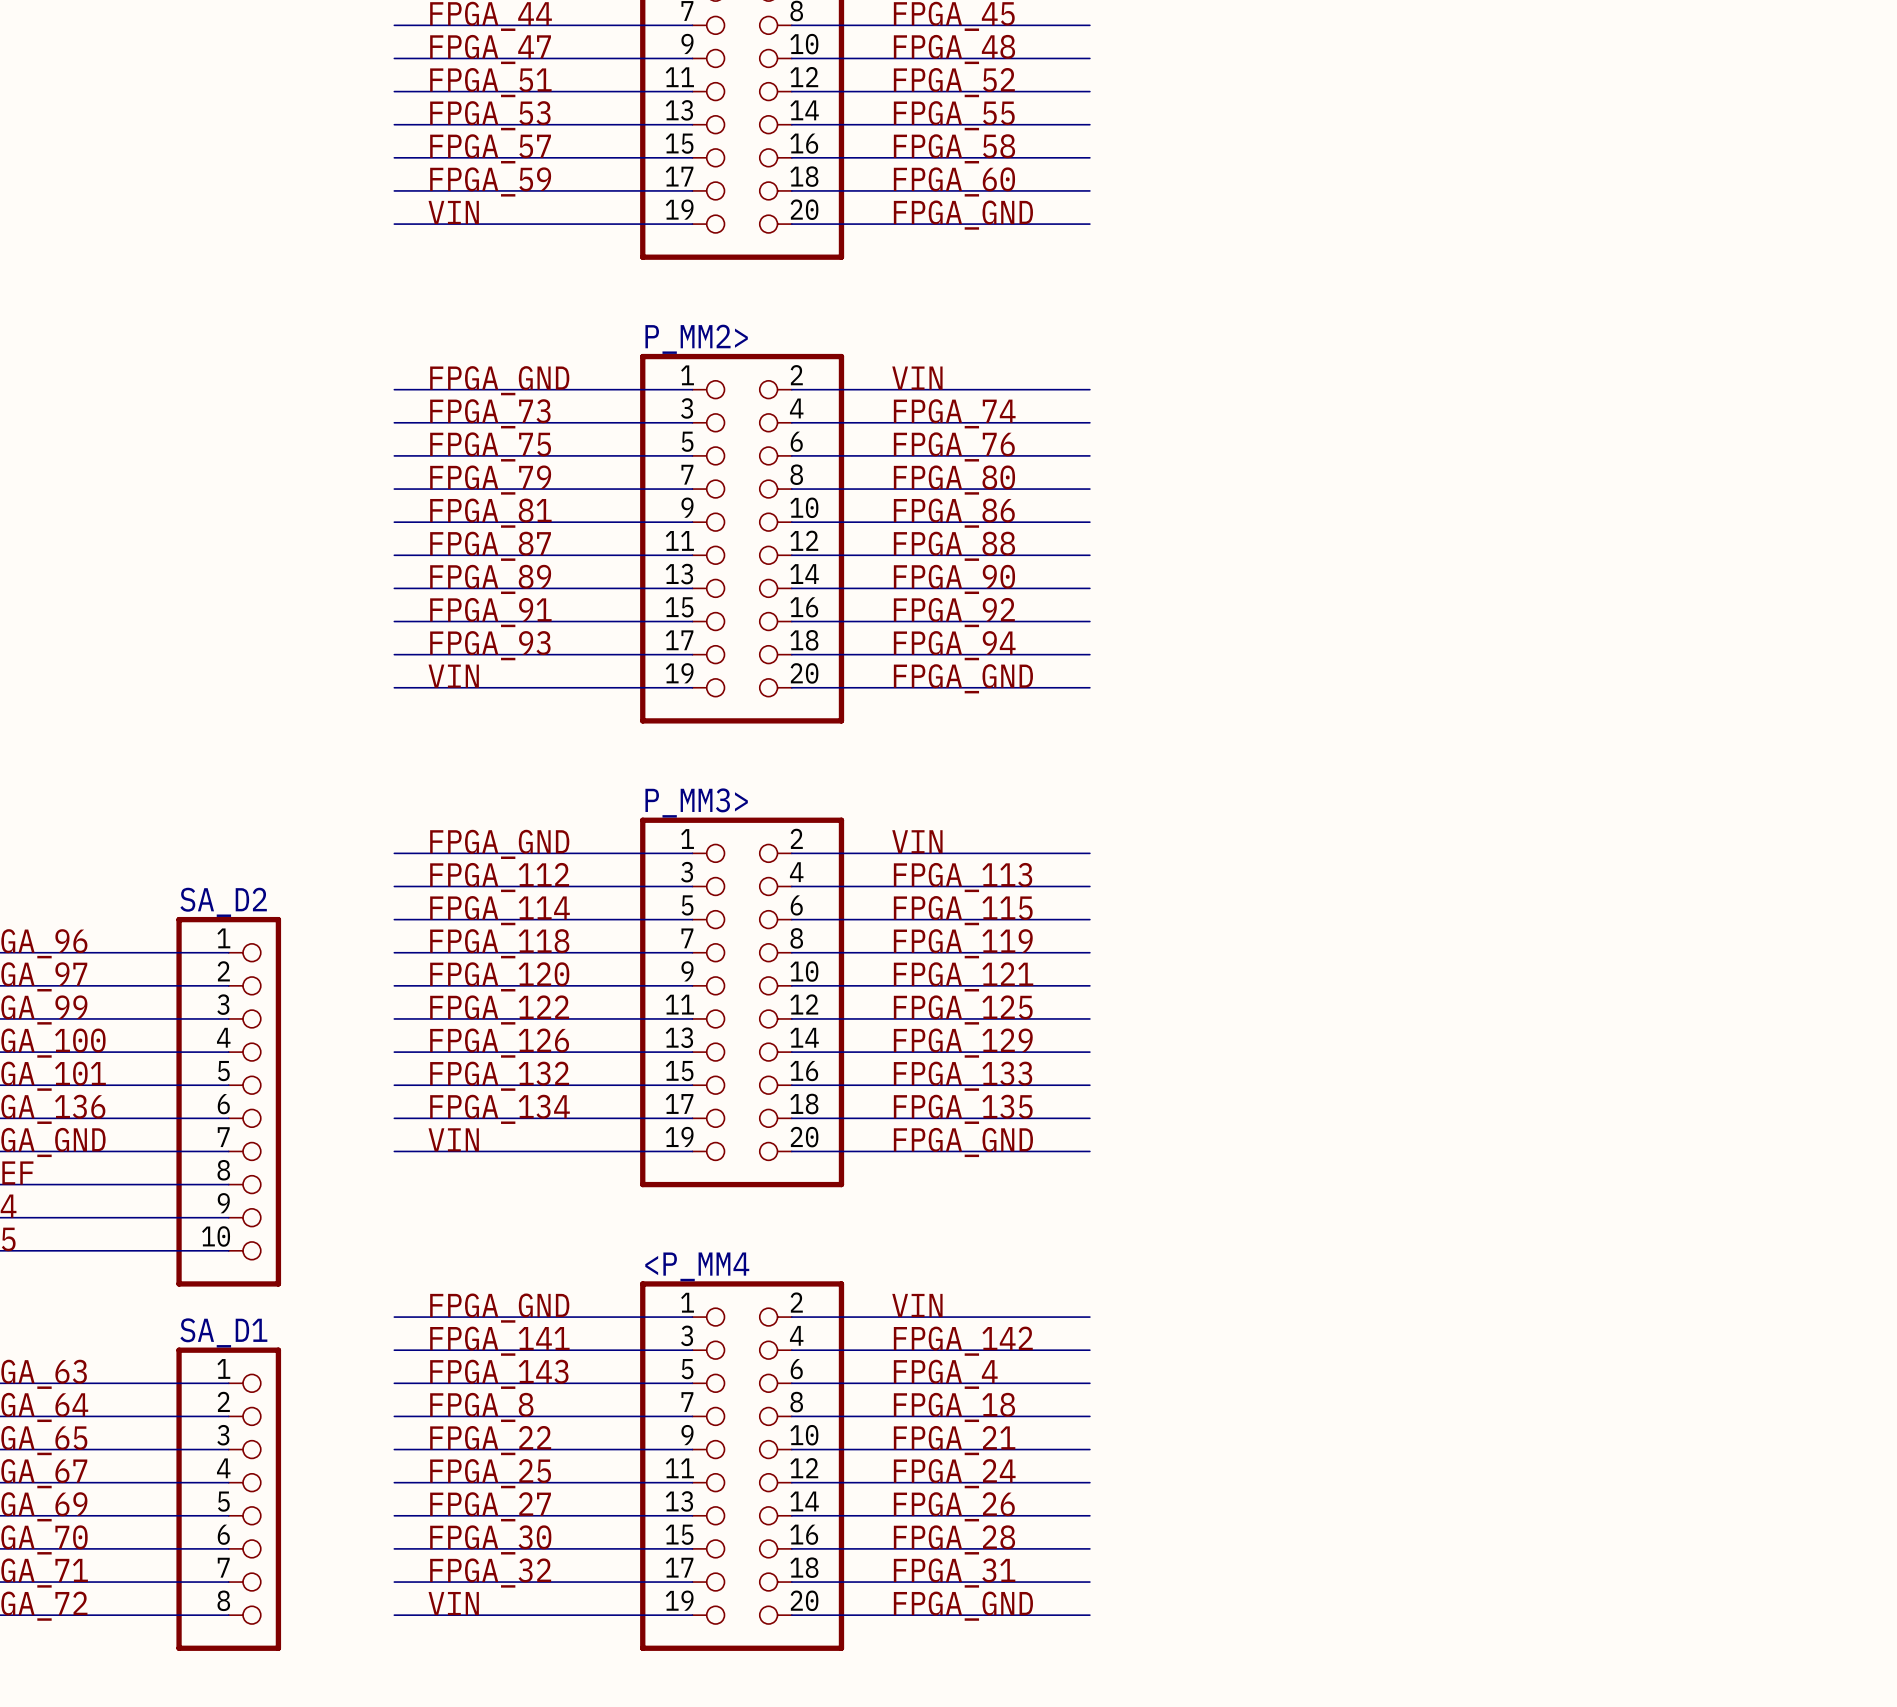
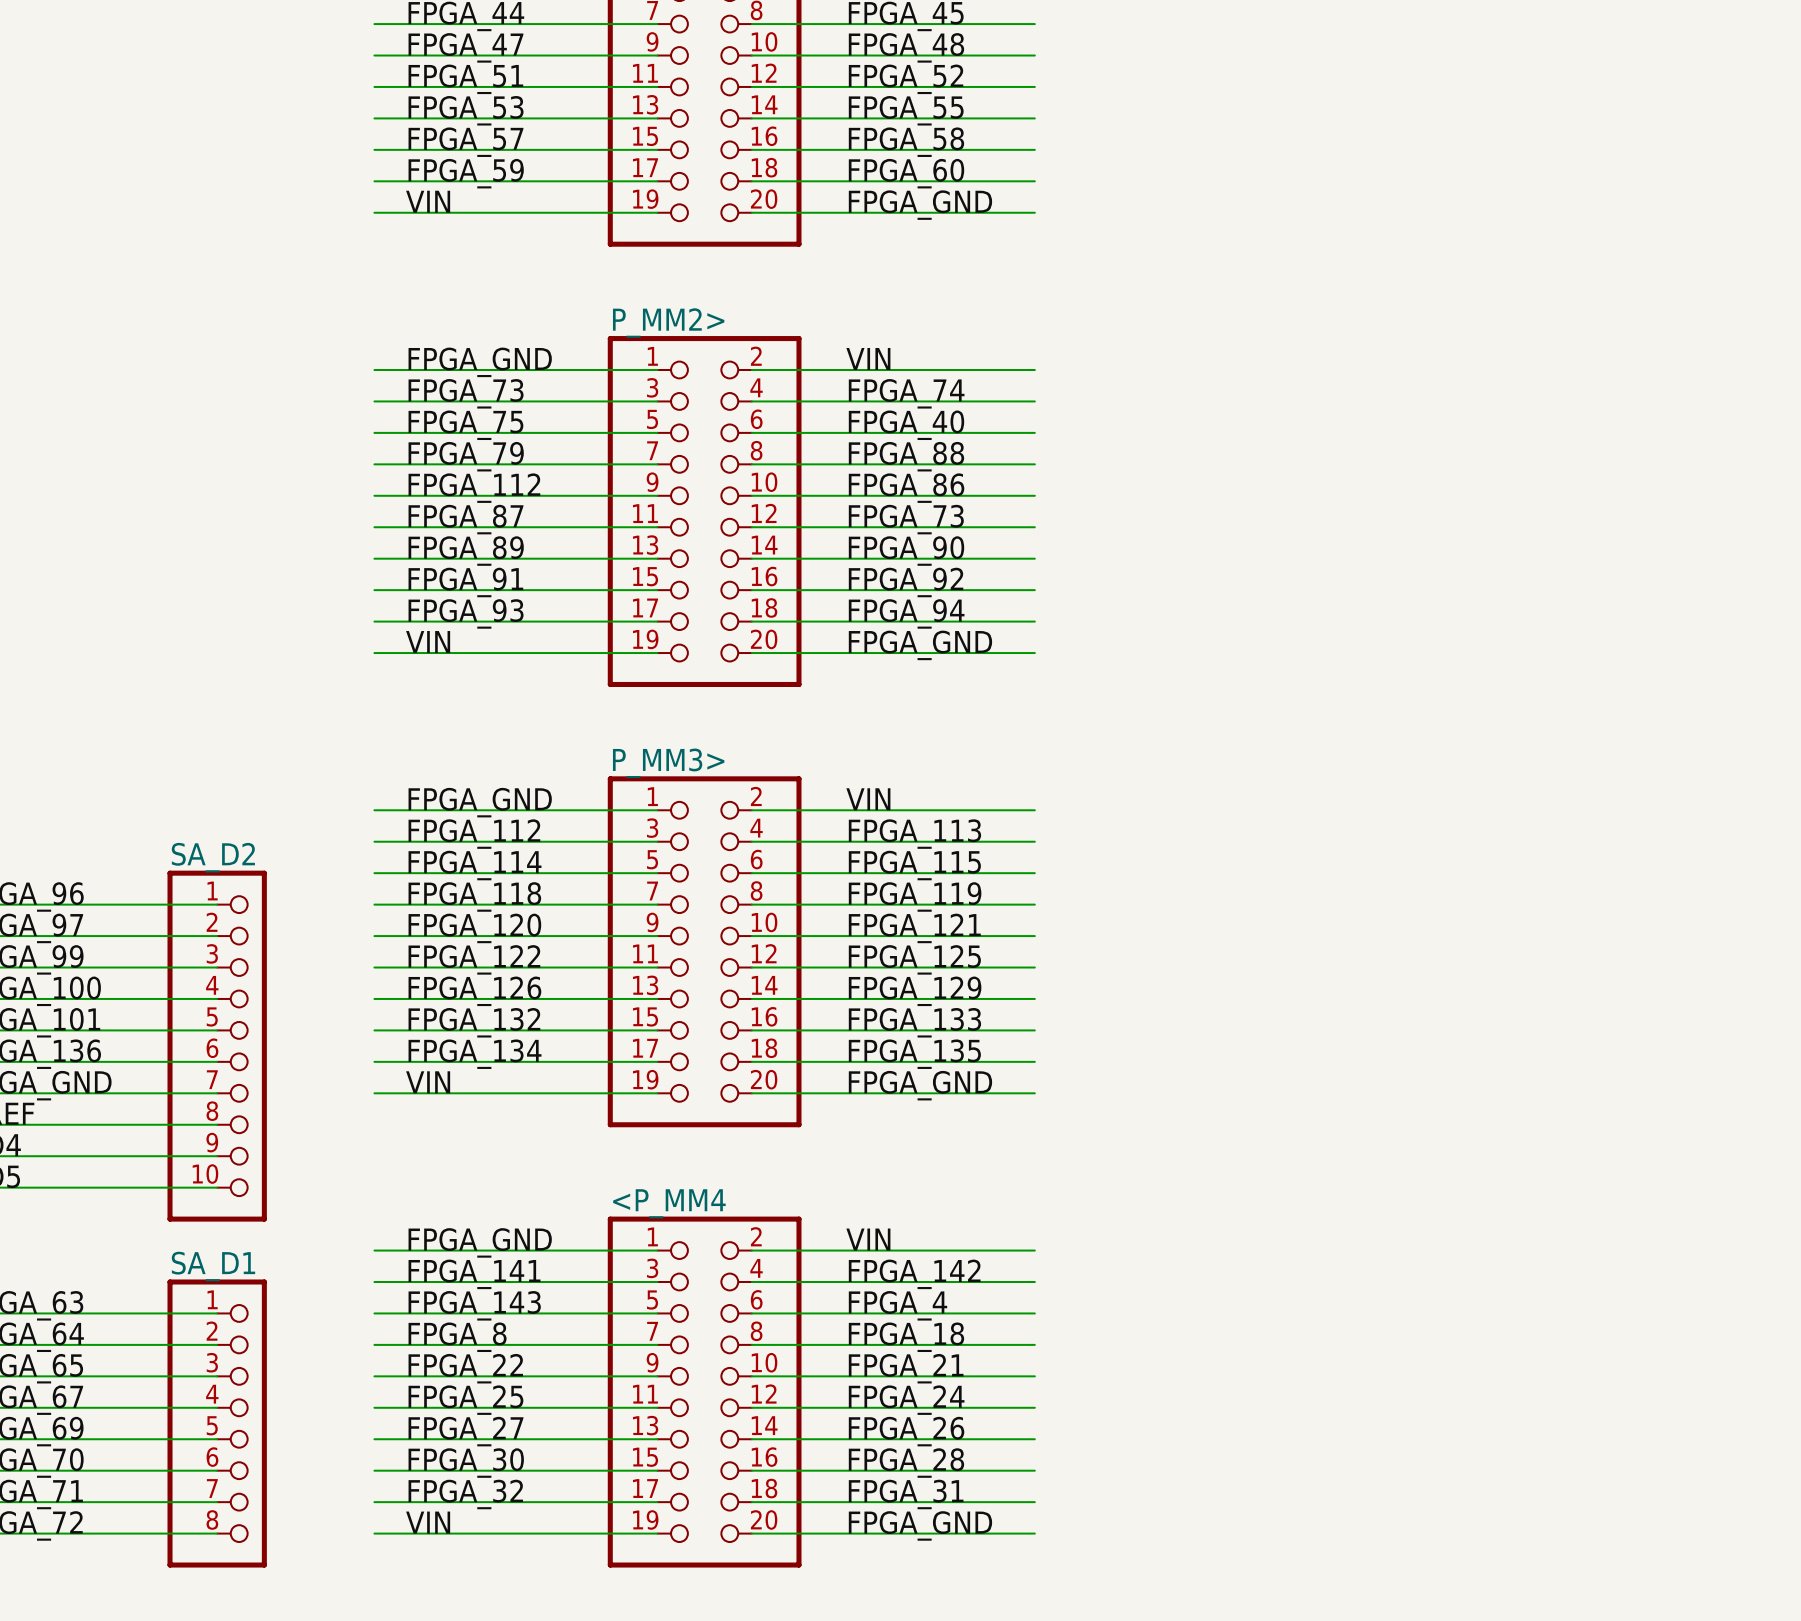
label: FPGA_76 (954, 446) -> FPGA_40 (906, 425)
label: FPGA_80 (954, 480) -> FPGA_88 (906, 456)
label: FPGA_81 (490, 513) -> FPGA_112 (474, 488)
label: FPGA_88 (954, 546) -> FPGA_73 (906, 519)

